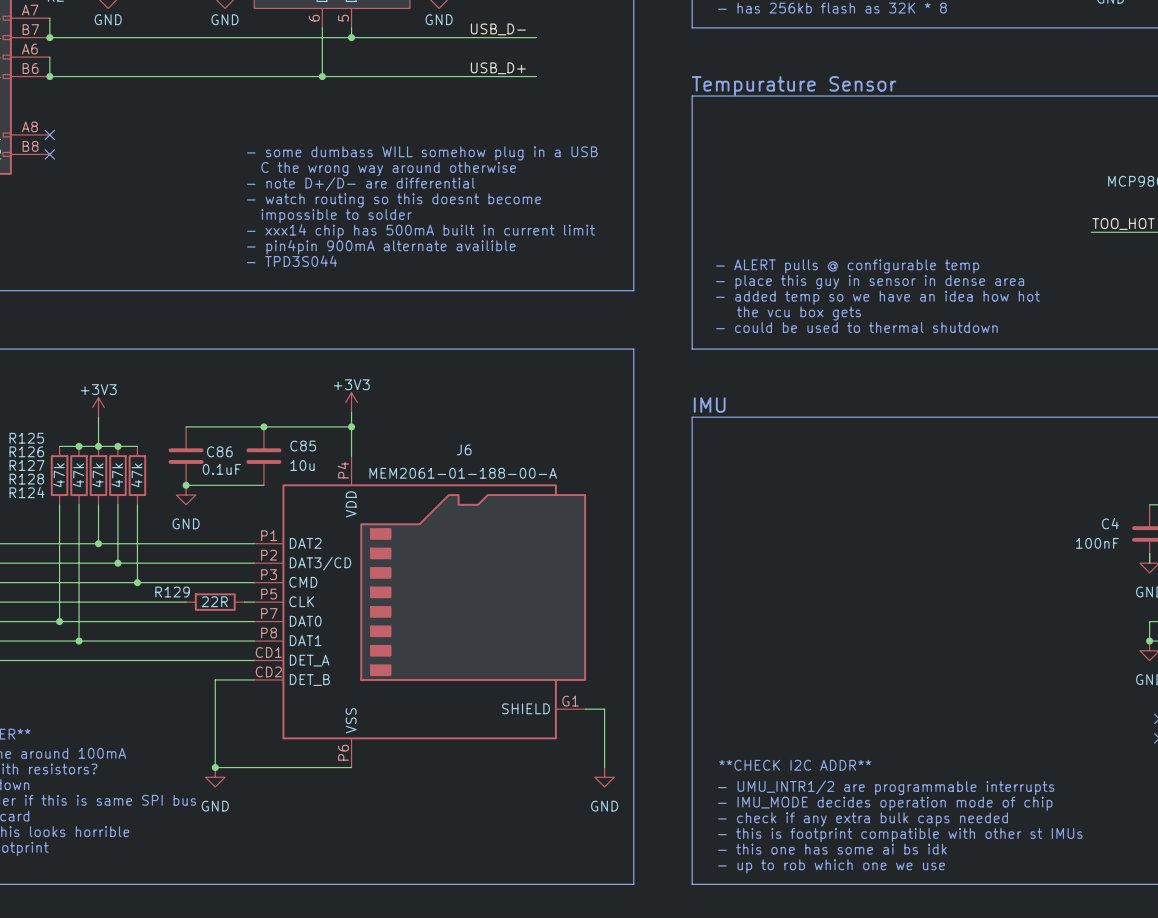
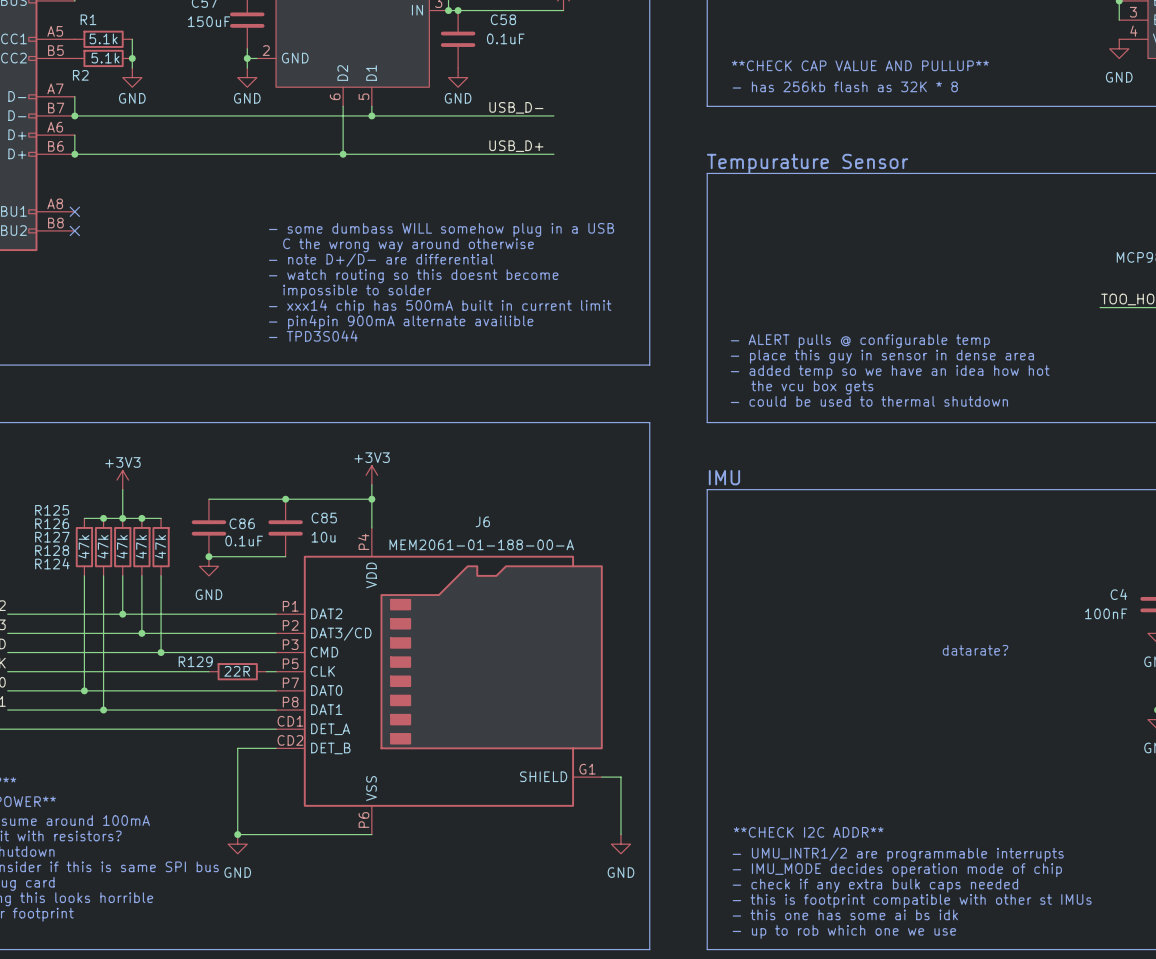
text: none -> datarate? (975, 650)

